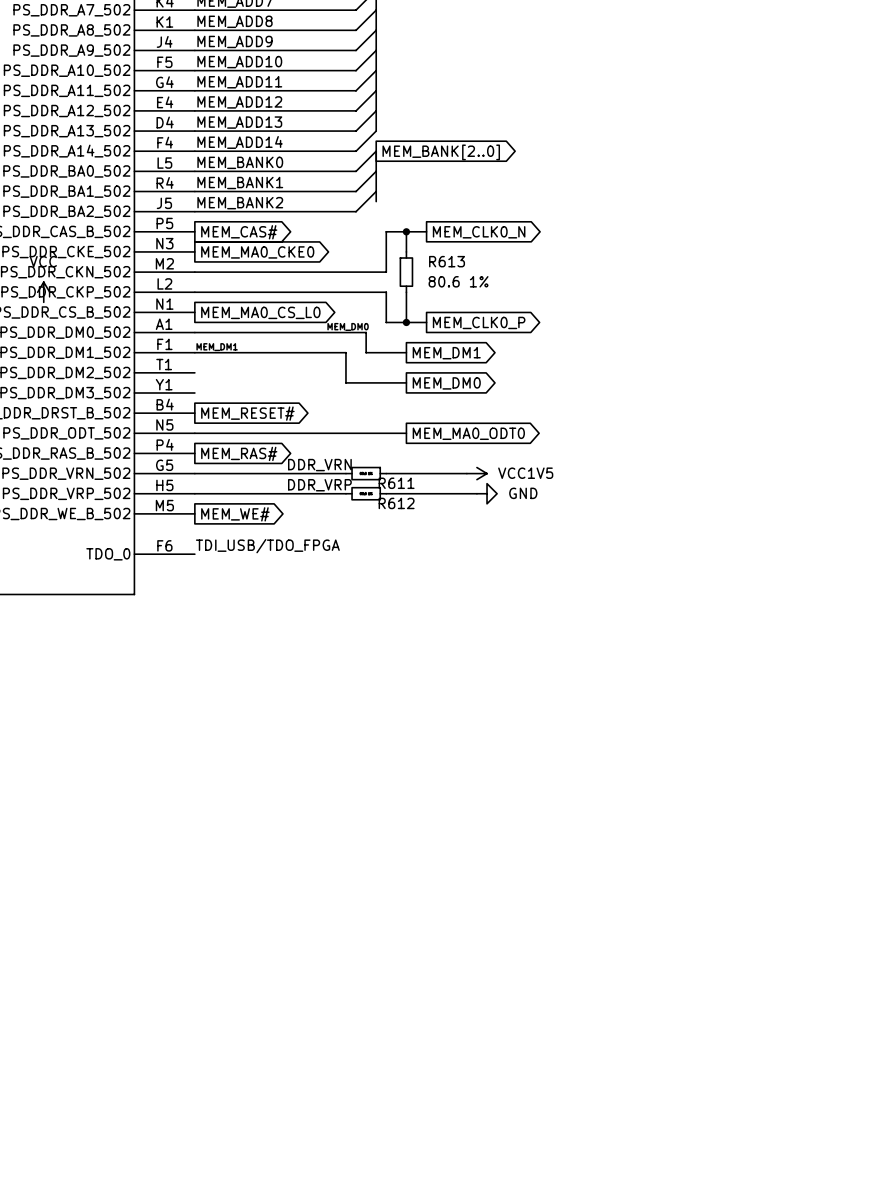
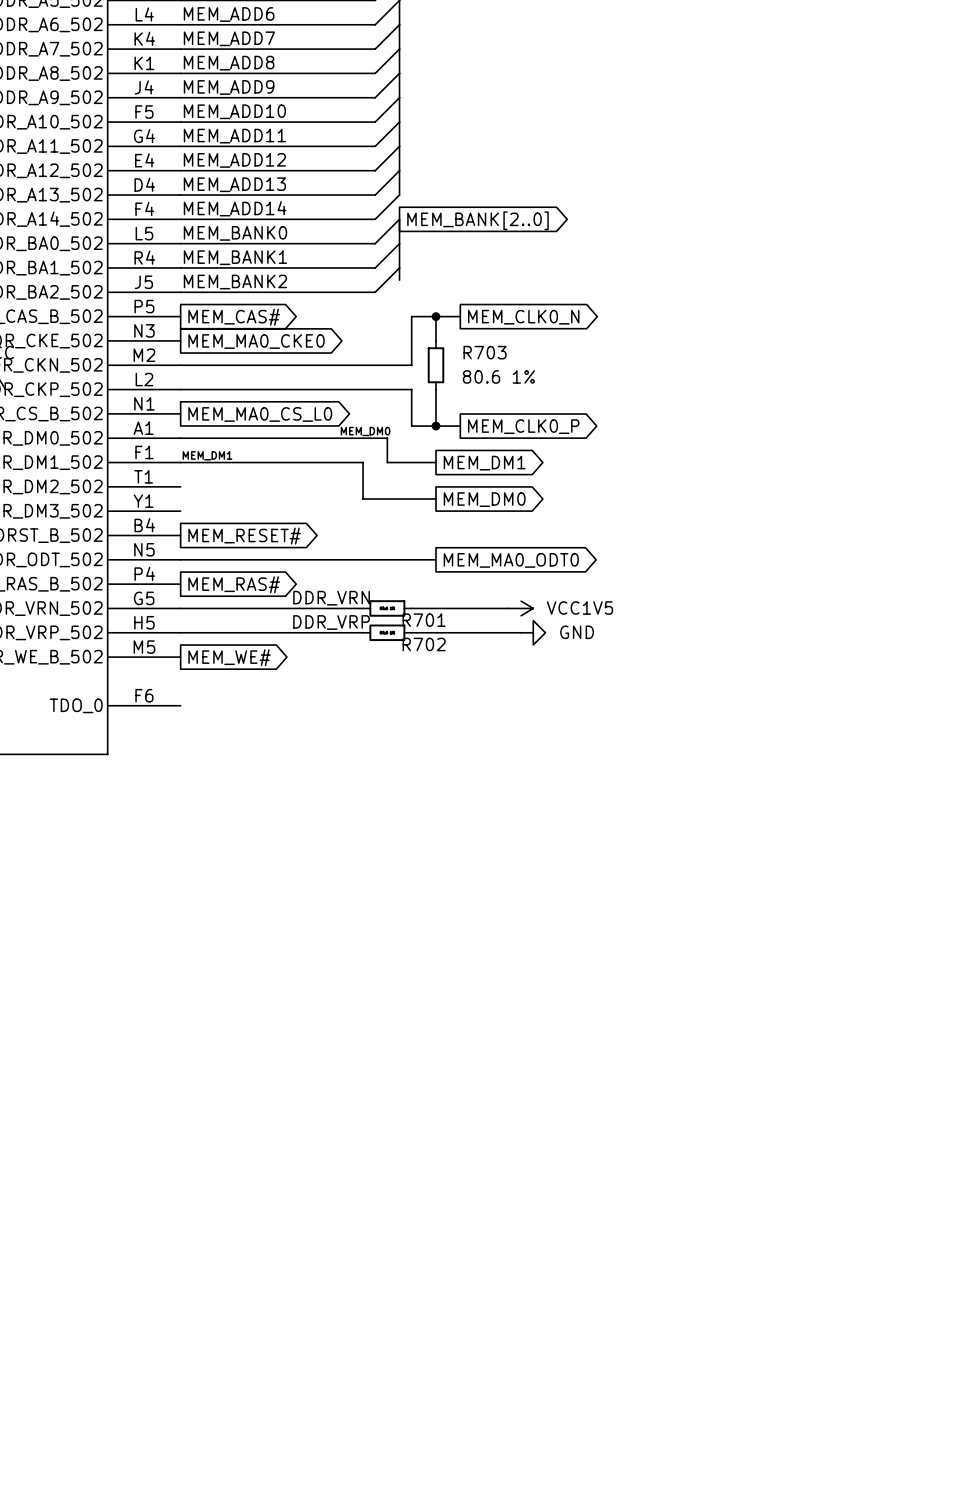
R613 name: R613 (447, 261) -> R703 (485, 352)
R611 name: R611 (396, 483) -> R701 (424, 620)
R612 name: R612 (396, 503) -> R702 (424, 644)
label: TDI_USB/TDO_FPGA (267, 546) -> none

